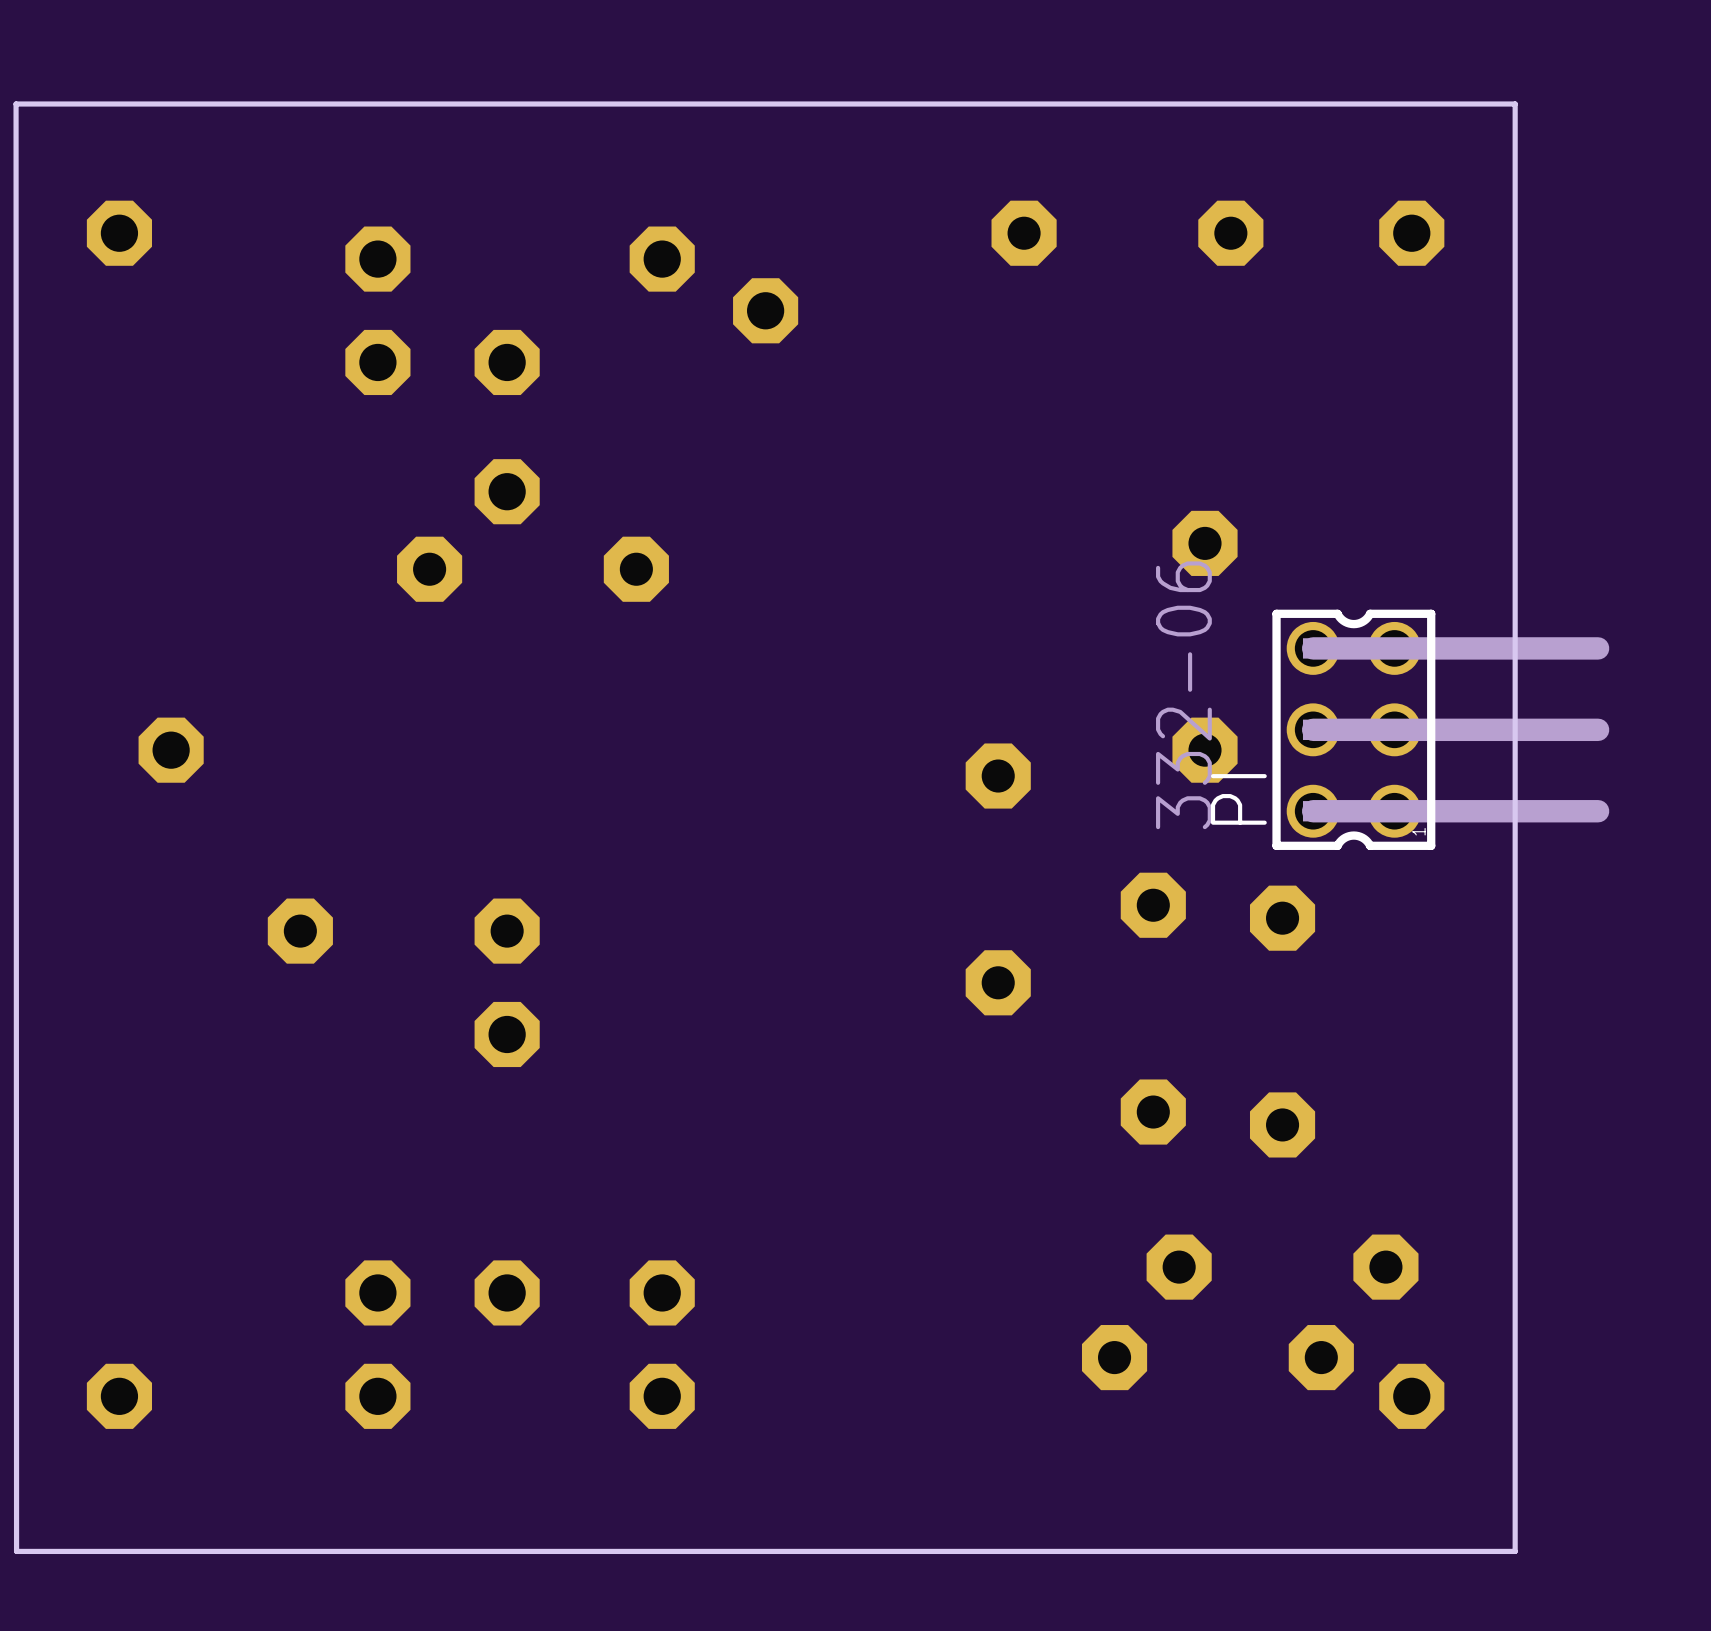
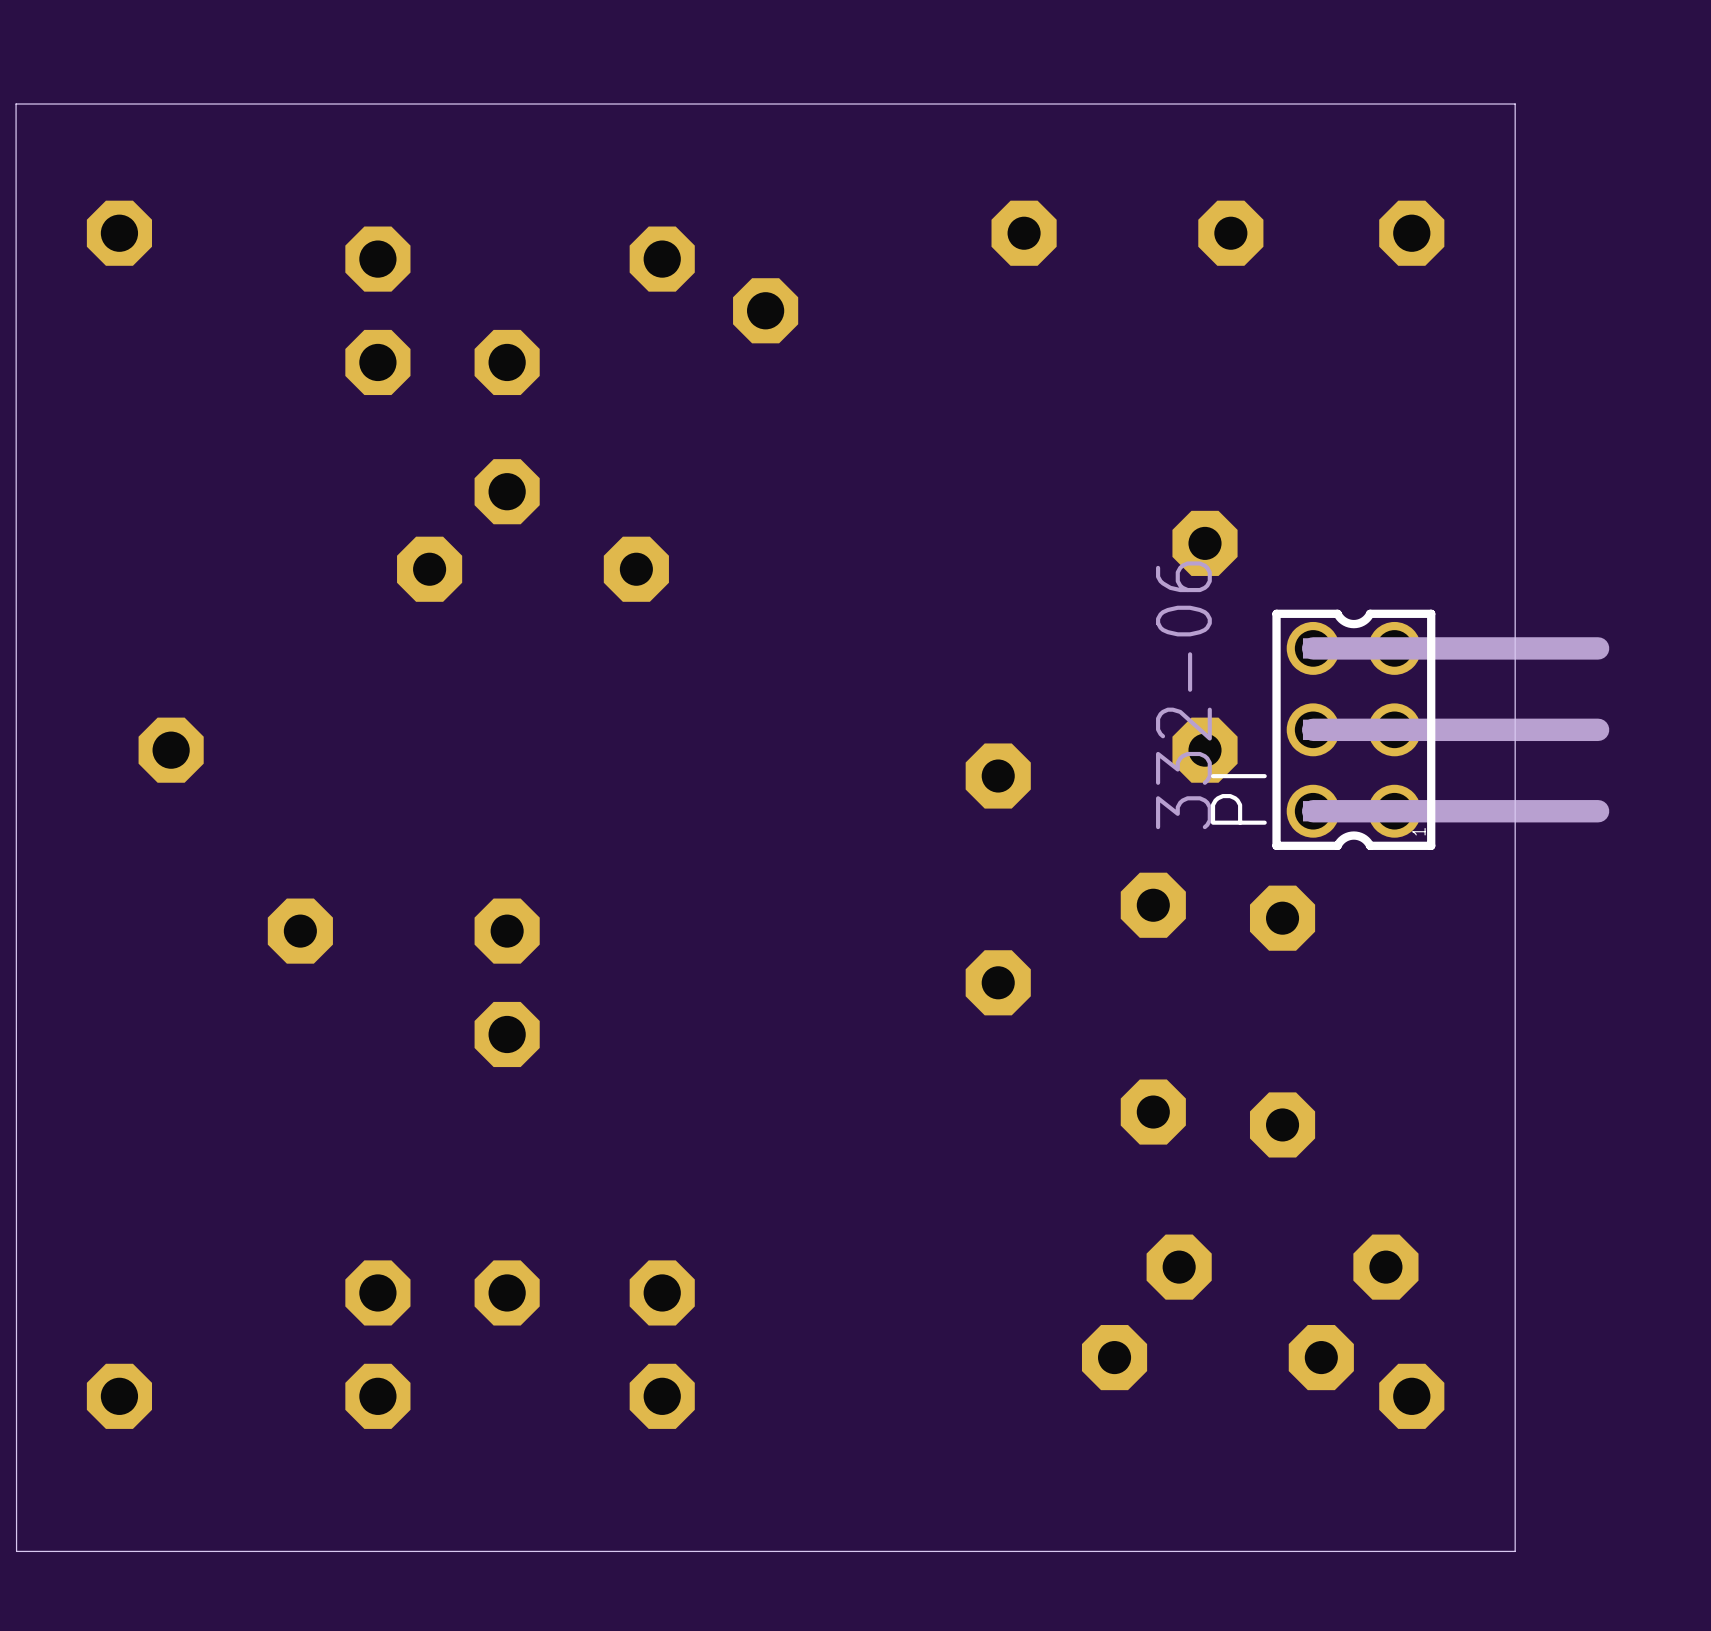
board edge width: thick (1515, 104) (16, 104) (16, 1551) (1515, 1551) (1515, 104) -> thin (1515, 104) (16, 104) (16, 1551) (1515, 1551) (1515, 104)

